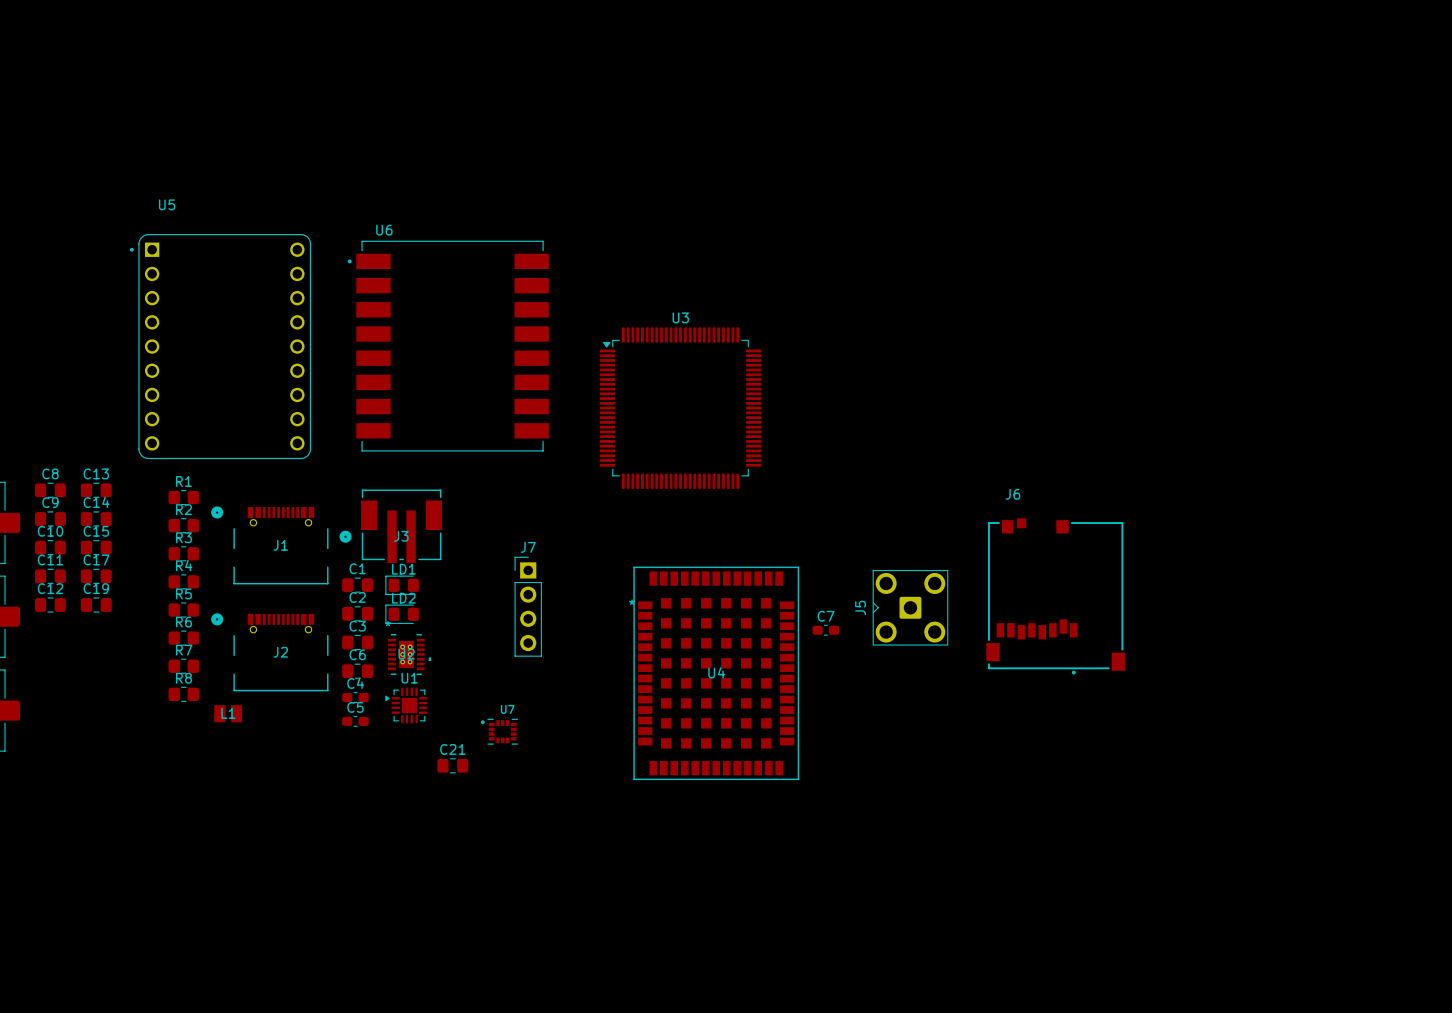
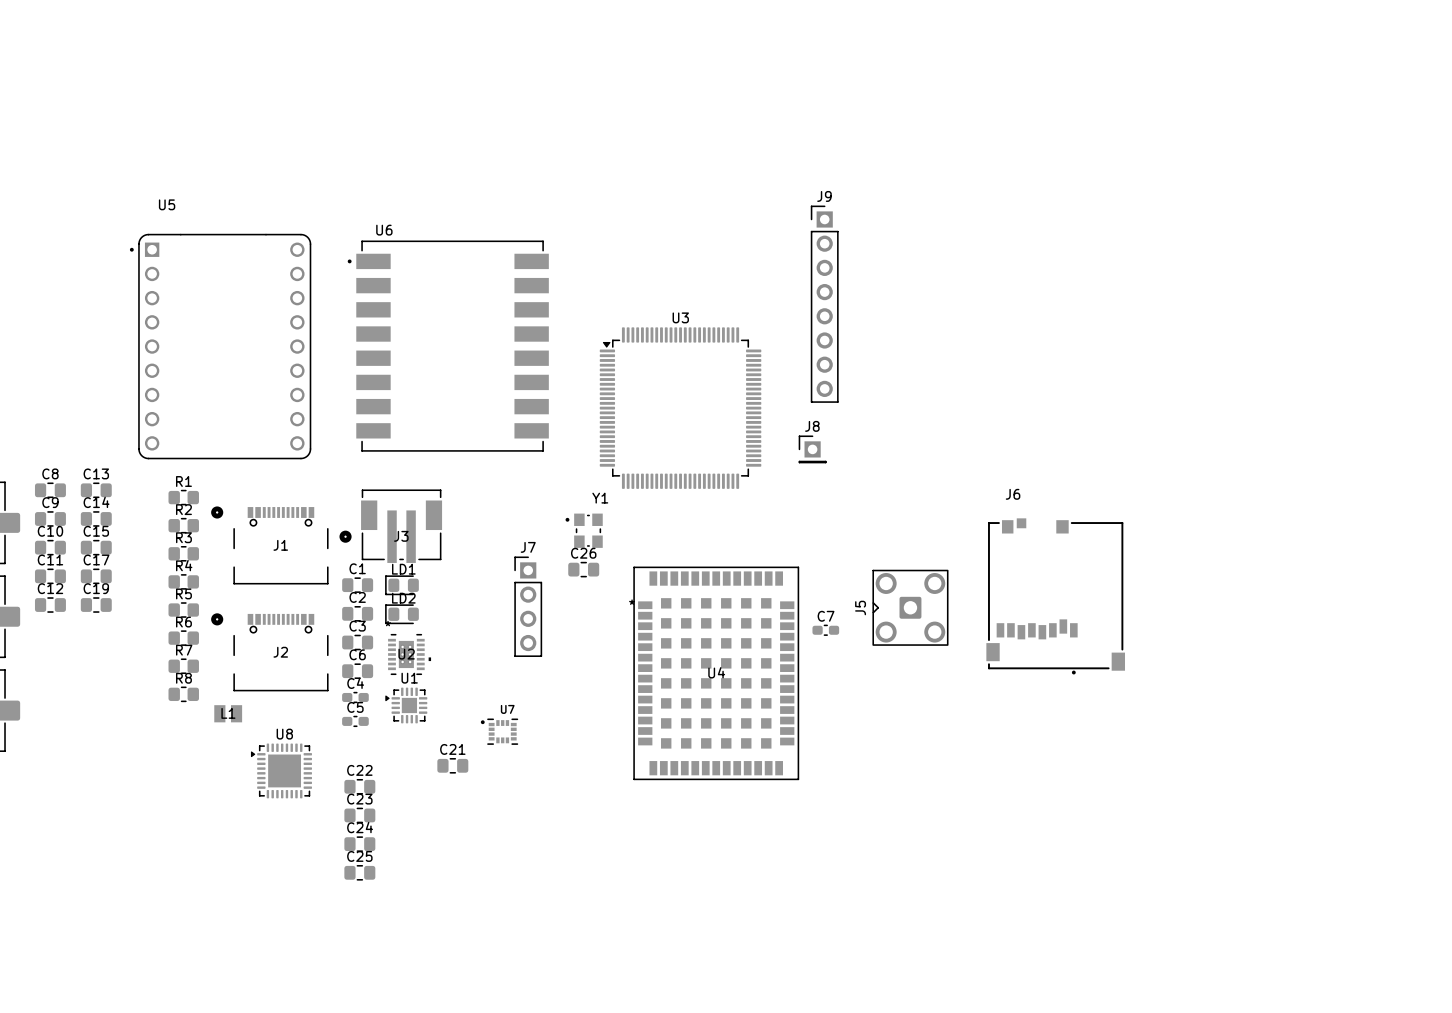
J9: none -> (824, 304)
J8: none -> (812, 449)
Y1: none -> (584, 530)
C26: none -> (583, 569)
U8: none -> (281, 770)
C22: none -> (359, 786)
C23: none -> (359, 815)
C24: none -> (359, 844)
C25: none -> (359, 872)

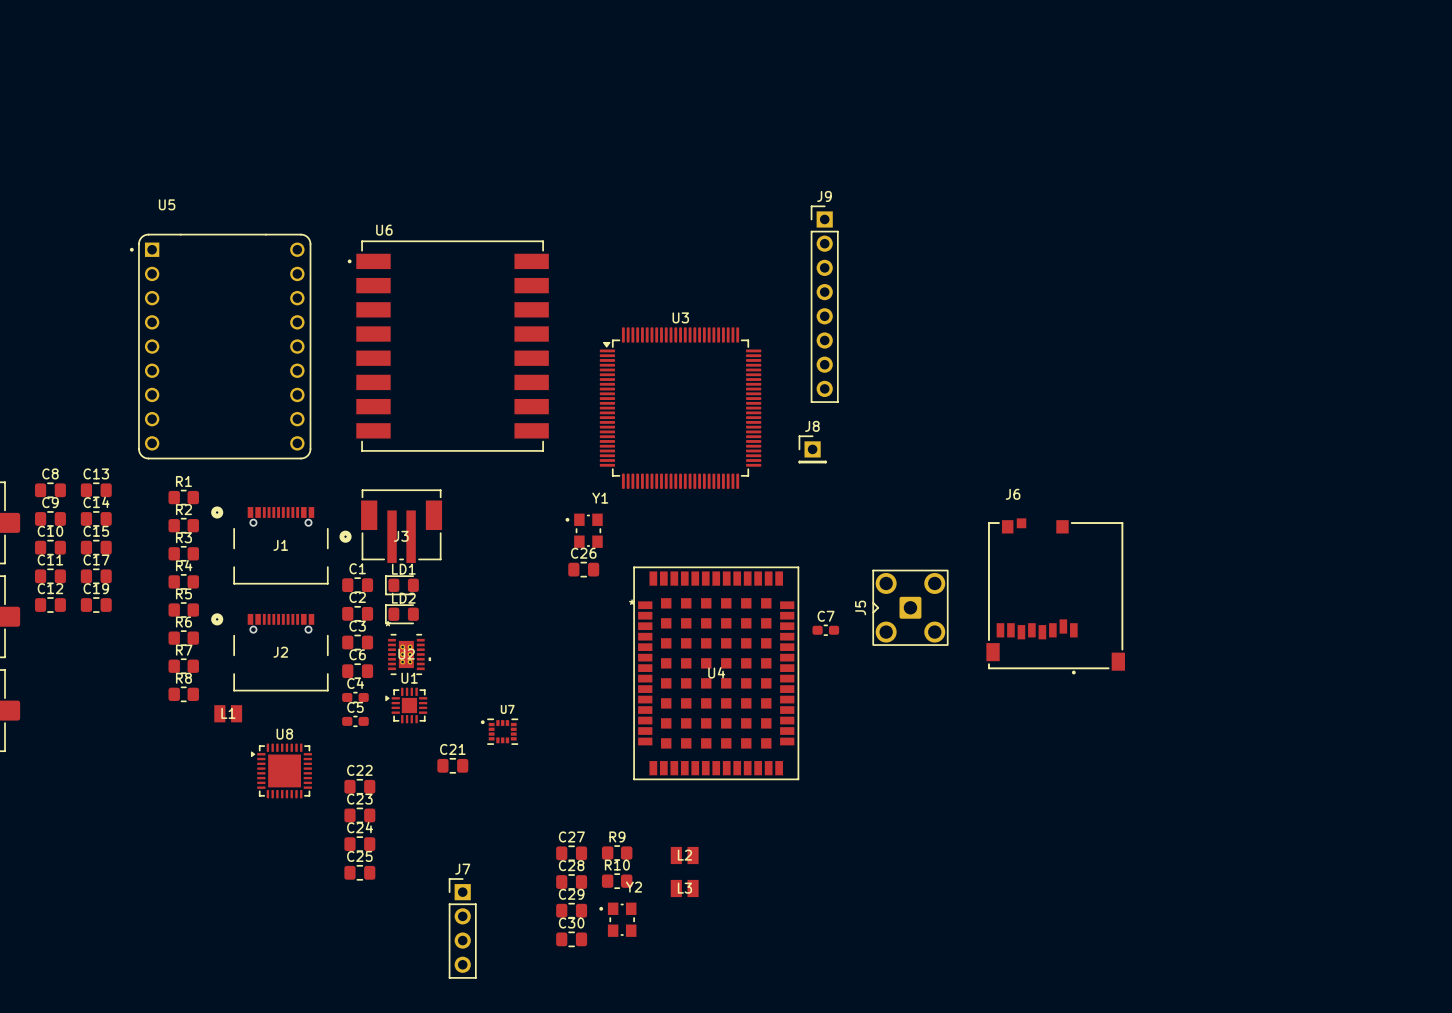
J7 position: (528, 606) -> (462, 928)
C27: none -> (571, 853)
R9: none -> (617, 853)
L2: none -> (684, 855)
R10: none -> (617, 881)
C28: none -> (571, 882)
L3: none -> (684, 888)
C29: none -> (571, 910)
Y2: none -> (617, 919)
C30: none -> (571, 939)

